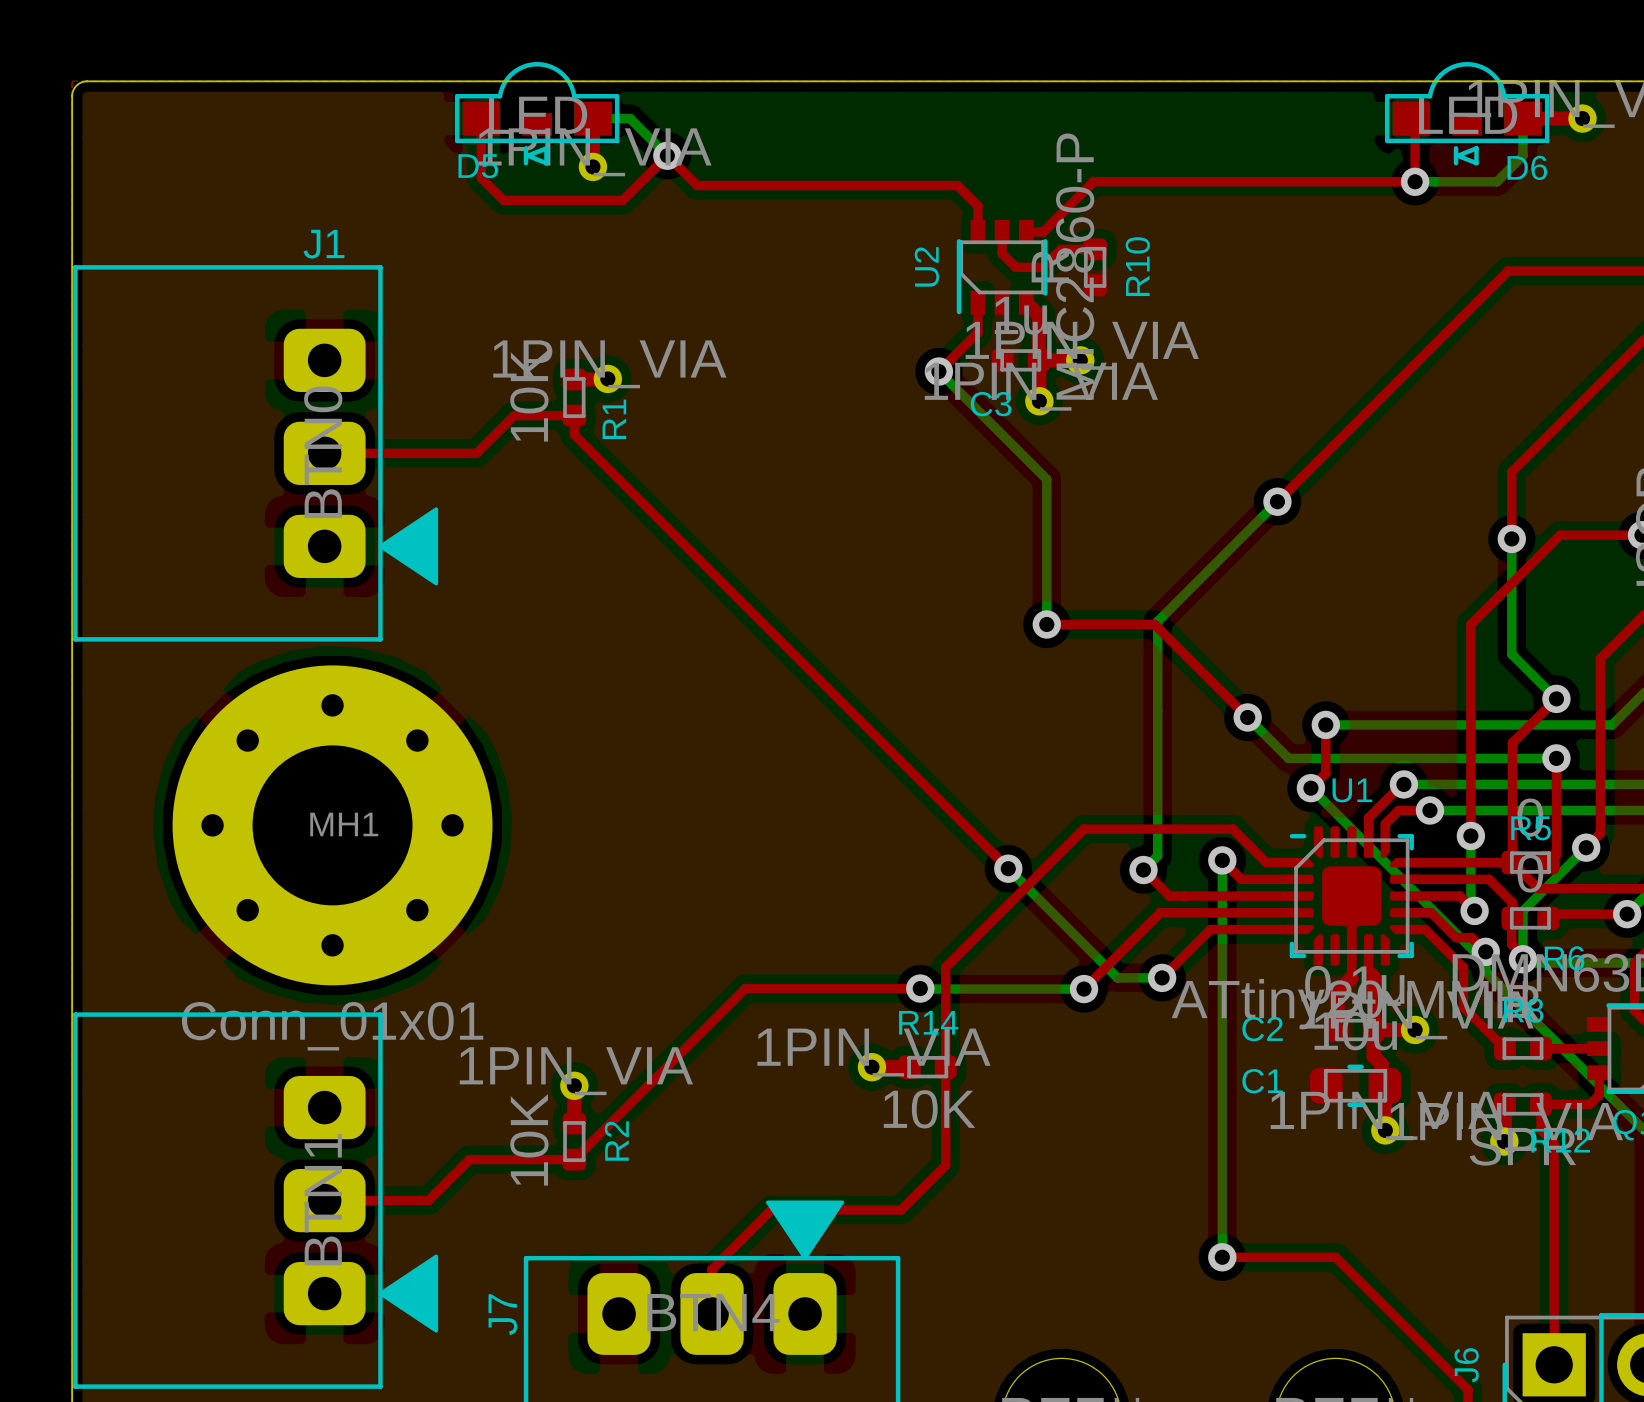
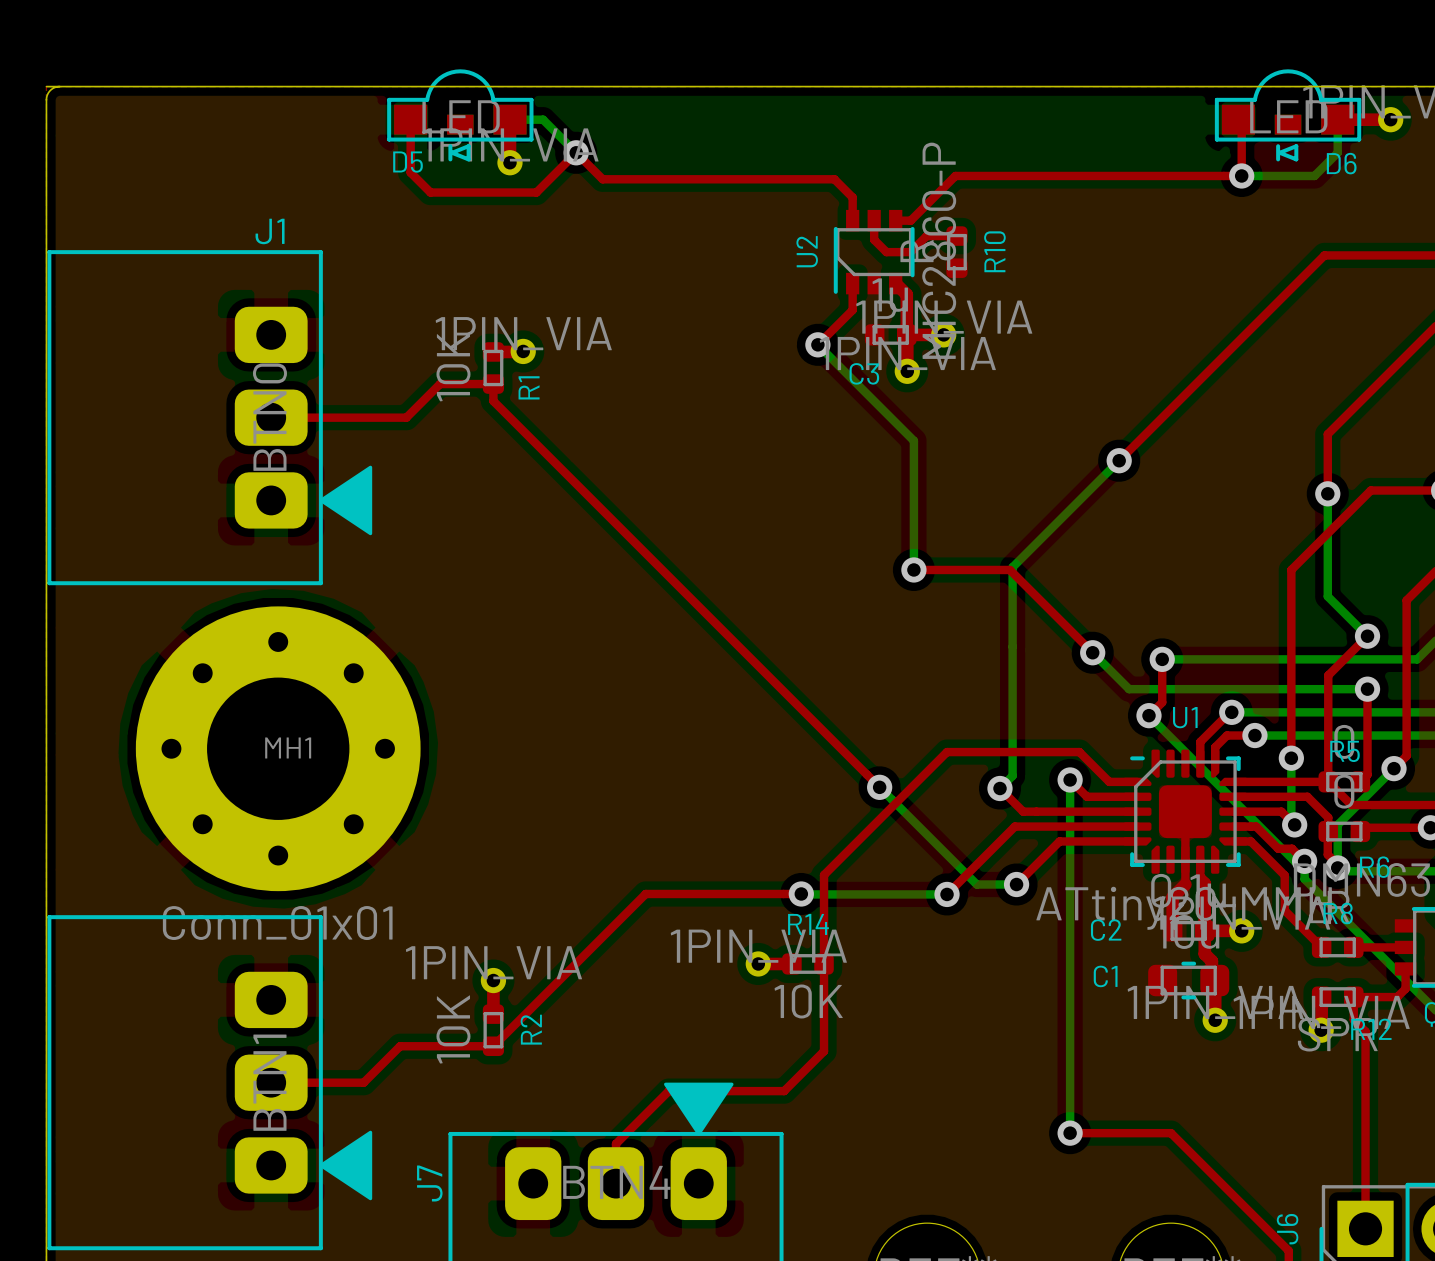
board edge: none -> (46, 86) (59, 86)

